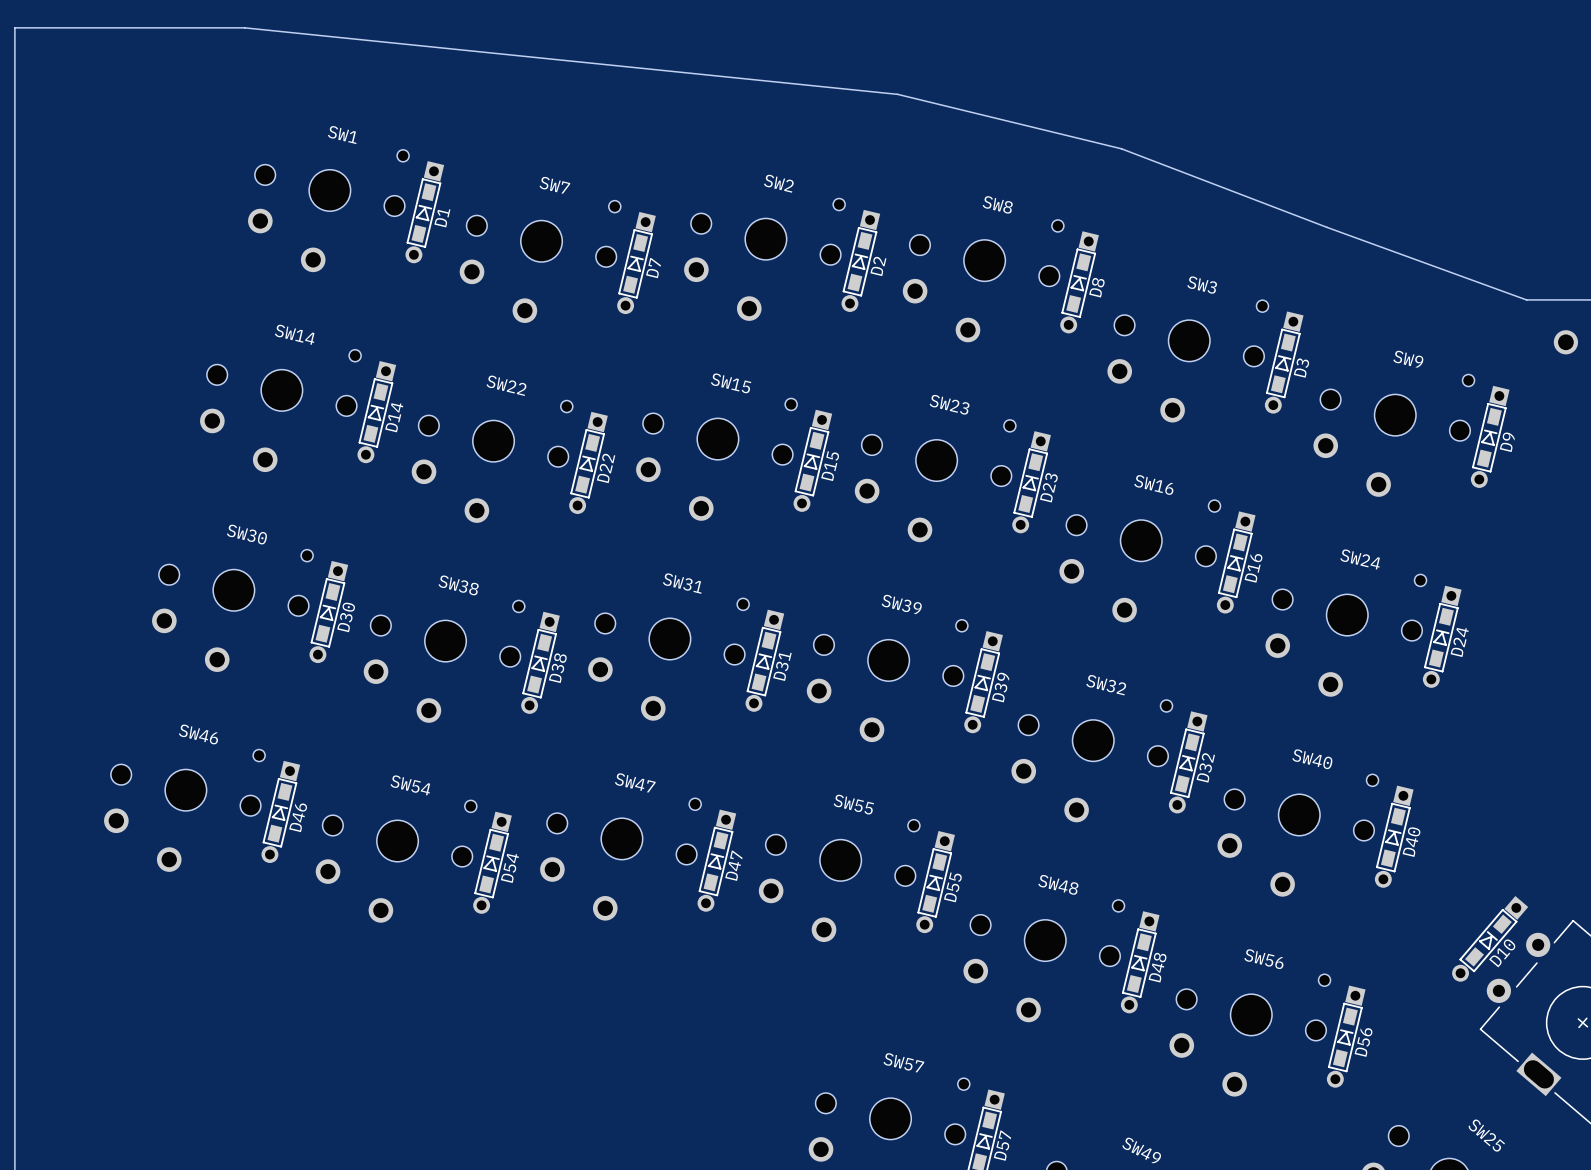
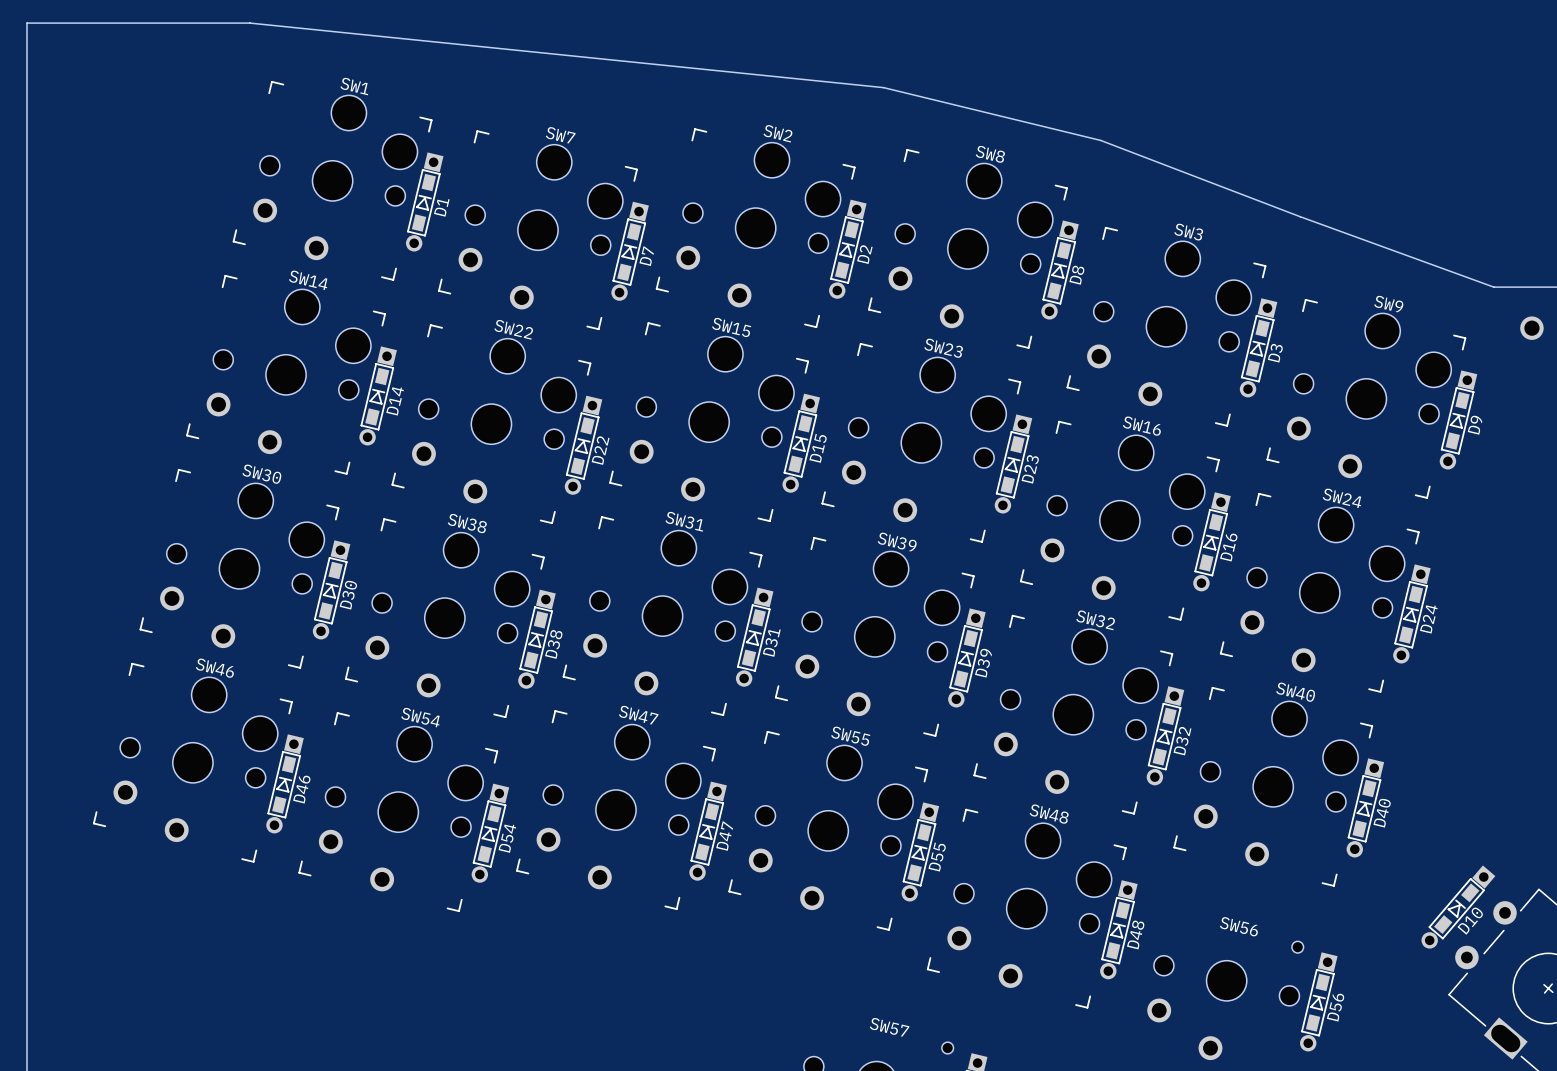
SW1 footprint: [248, 149, 410, 273] -> [232, 80, 433, 281]
SW2 footprint: [684, 198, 846, 321] -> [655, 128, 856, 329]
SW7 footprint: [459, 200, 621, 323] -> [438, 130, 638, 331]
SW8 footprint: [902, 219, 1064, 343] -> [868, 149, 1068, 349]
SW3 footprint: [1107, 300, 1269, 423] -> [1066, 226, 1267, 427]
SW14 footprint: [200, 349, 362, 473] -> [186, 274, 386, 475]
SW9 footprint: [1313, 374, 1475, 497] -> [1266, 298, 1467, 499]
SW15 footprint: [636, 398, 798, 521] -> [609, 322, 810, 523]
SW22 footprint: [411, 400, 573, 523] -> [391, 324, 592, 525]
SW23 footprint: [854, 419, 1016, 543] -> [821, 342, 1022, 543]
SW16 footprint: [1059, 500, 1221, 623] -> [1019, 420, 1220, 621]
SW30 footprint: [152, 549, 314, 672] -> [139, 468, 340, 669]
SW24 footprint: [1265, 574, 1427, 697] -> [1219, 492, 1420, 693]
SW31 footprint: [588, 598, 750, 721] -> [562, 516, 763, 717]
SW38 footprint: [363, 600, 525, 723] -> [344, 518, 545, 719]
SW39 footprint: [806, 619, 968, 743] -> [774, 536, 975, 737]
SW32 footprint: [1011, 700, 1173, 823] -> [973, 614, 1174, 815]
SW46 footprint: [104, 749, 266, 872] -> [92, 662, 293, 863]
SW40 footprint: [1217, 774, 1379, 897] -> [1173, 686, 1374, 887]
SW47 footprint: [540, 798, 702, 921] -> [516, 710, 716, 910]
SW54 footprint: [315, 800, 477, 923] -> [298, 712, 499, 913]
SW55 footprint: [758, 819, 920, 943] -> [728, 730, 929, 931]
SW48 footprint: [963, 899, 1125, 1023] -> [926, 808, 1127, 1009]

